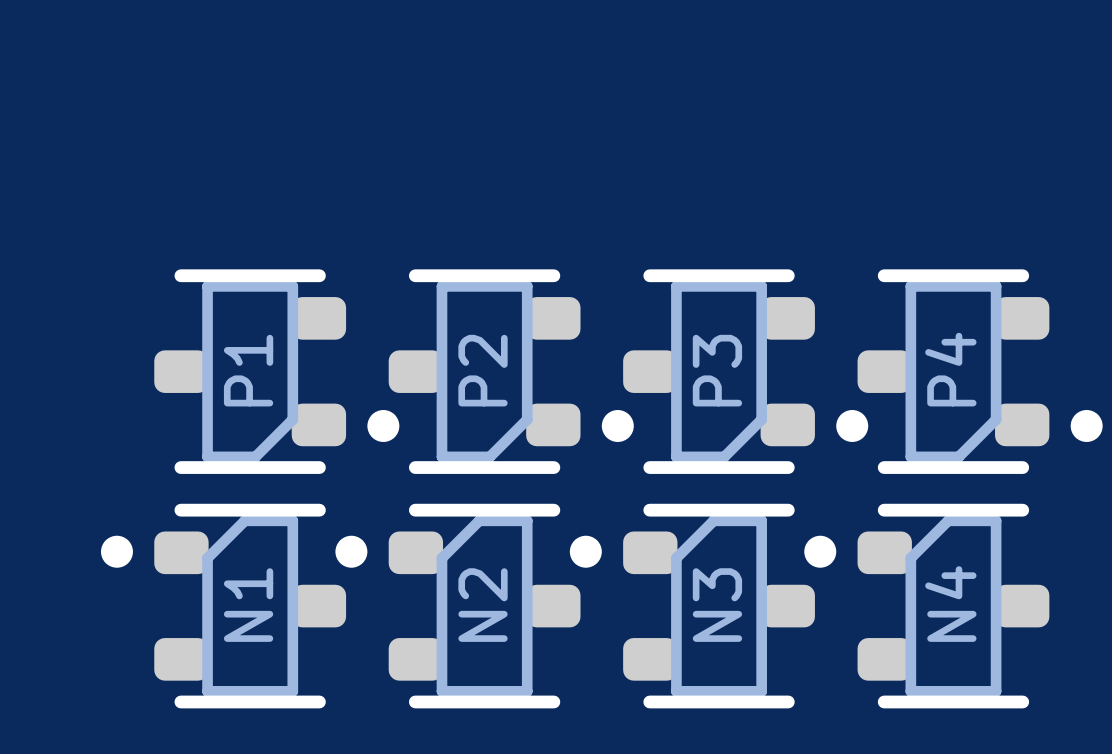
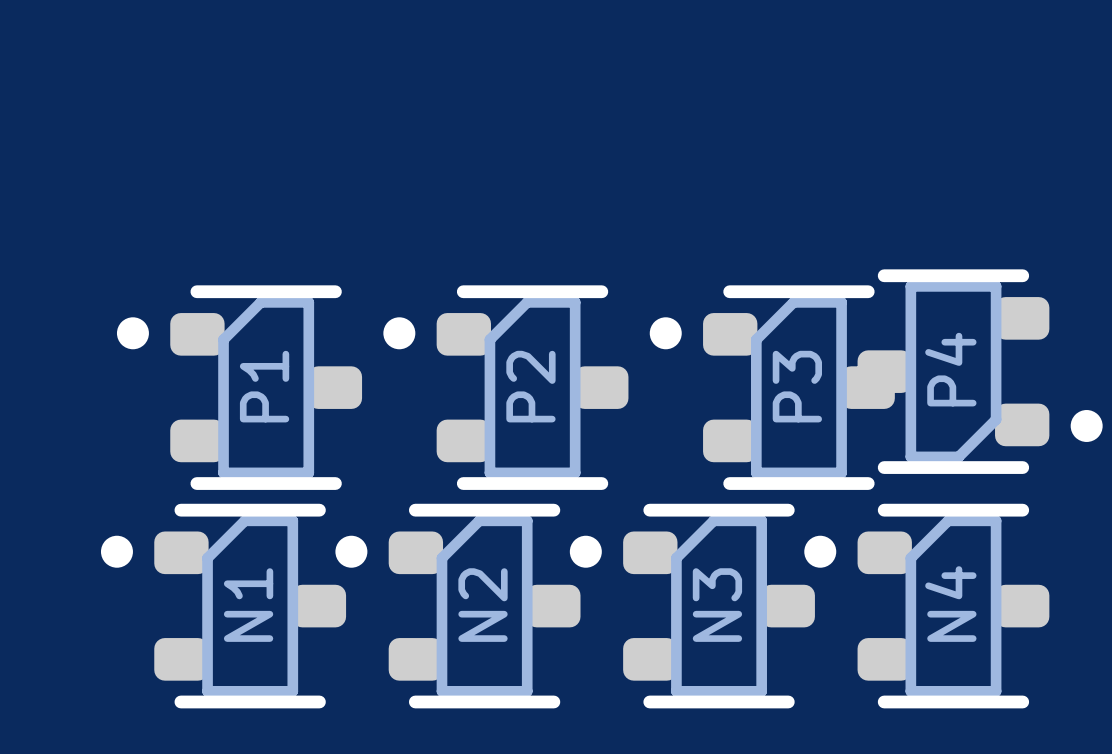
P1 rotation: 0° (276, 371) -> 180° (239, 387)
P2 rotation: 0° (511, 371) -> 180° (505, 387)
P3 rotation: 0° (745, 371) -> 180° (772, 387)

